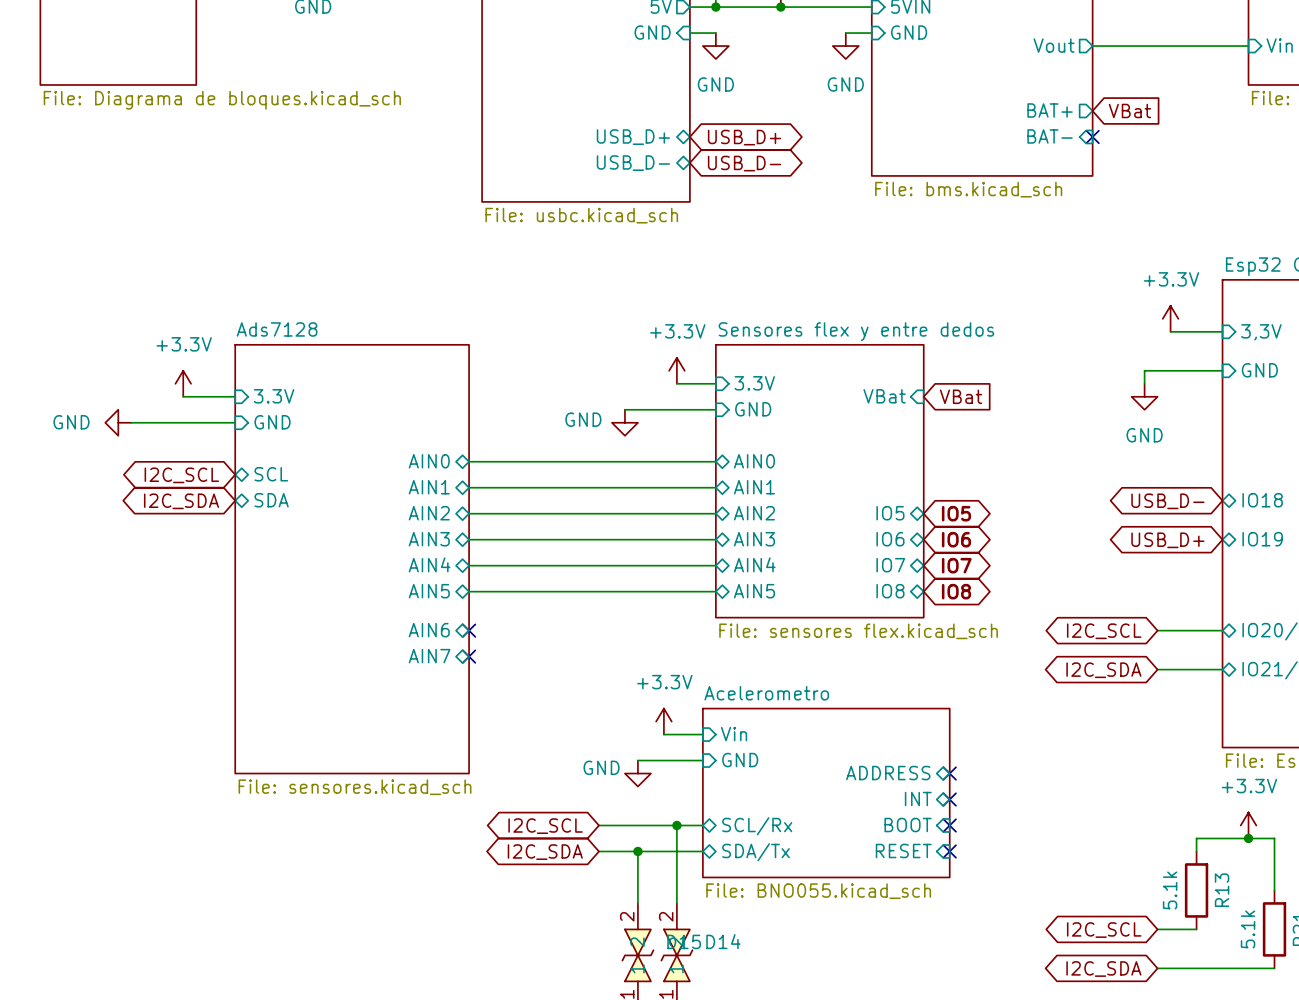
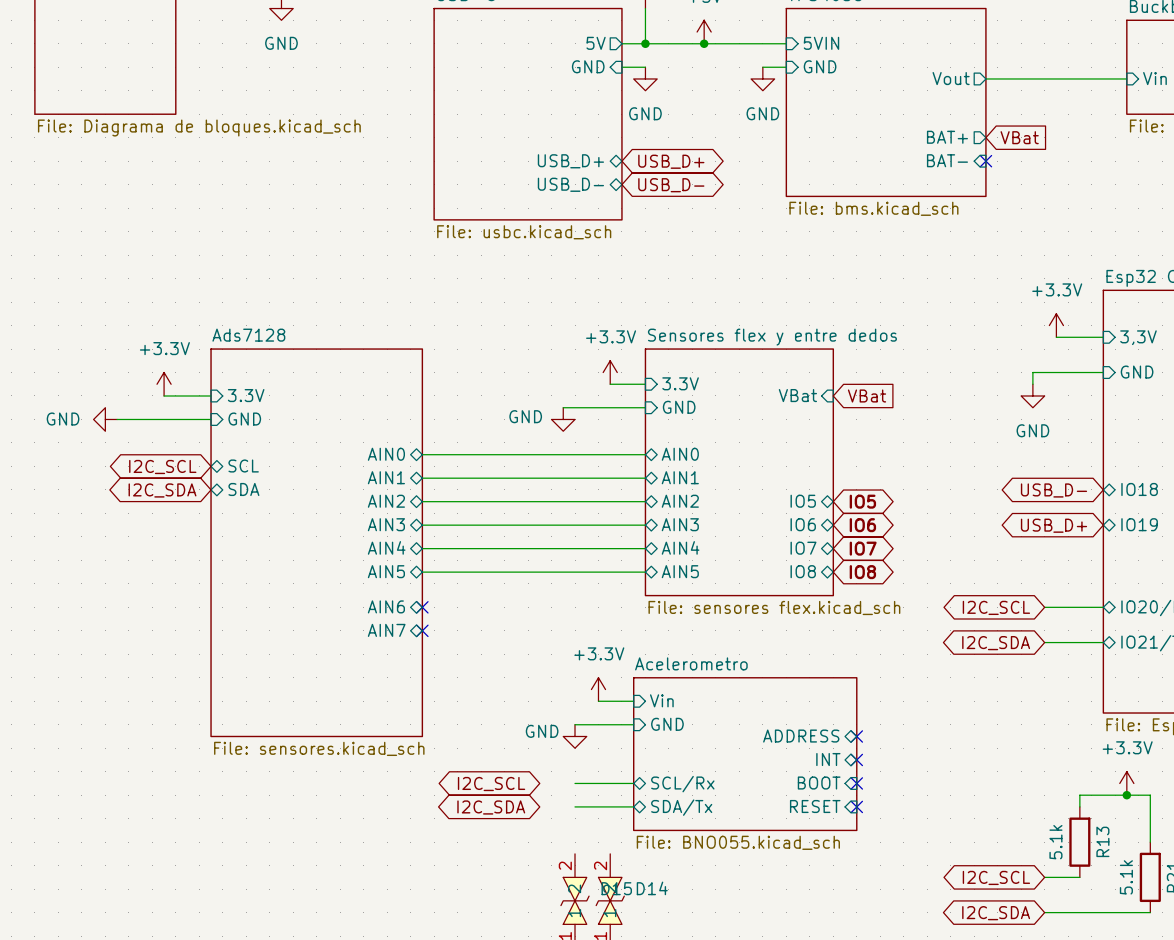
wire: (598, 825) (637, 825) -> none
wire: (676, 825) (676, 903) -> none
junction: (676, 825) -> none
wire: (598, 851) (637, 851) (637, 903) -> none
junction: (637, 851) -> none

